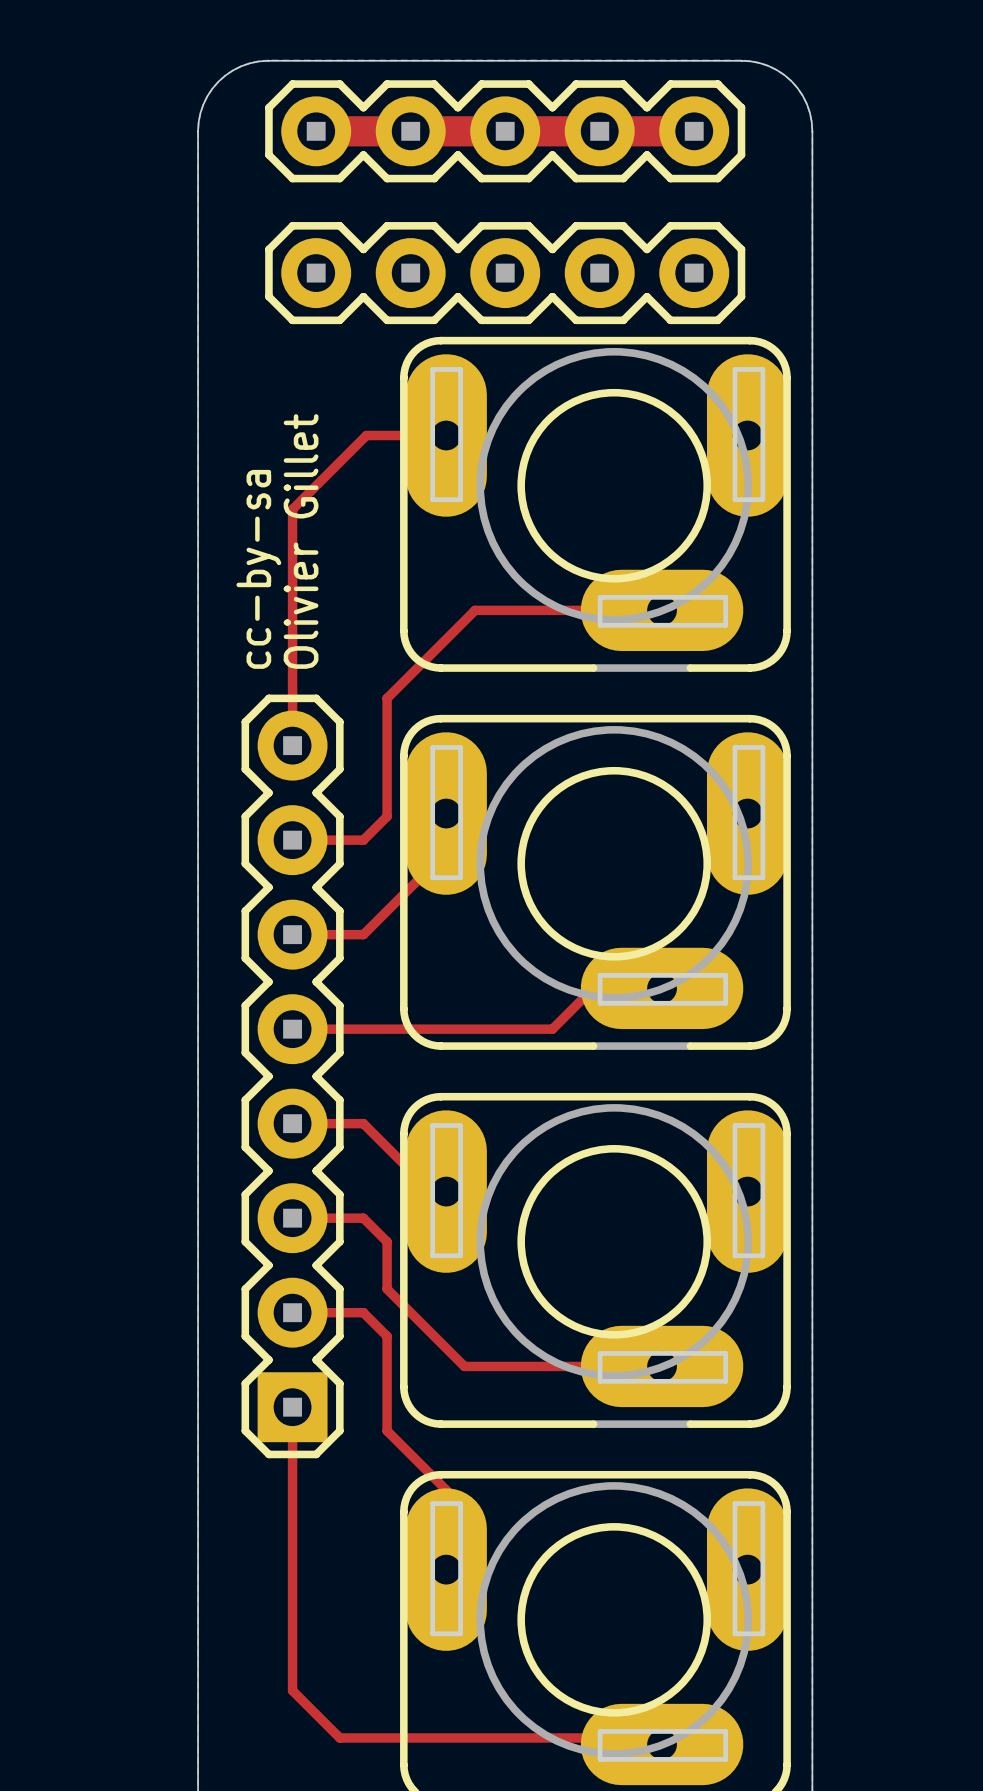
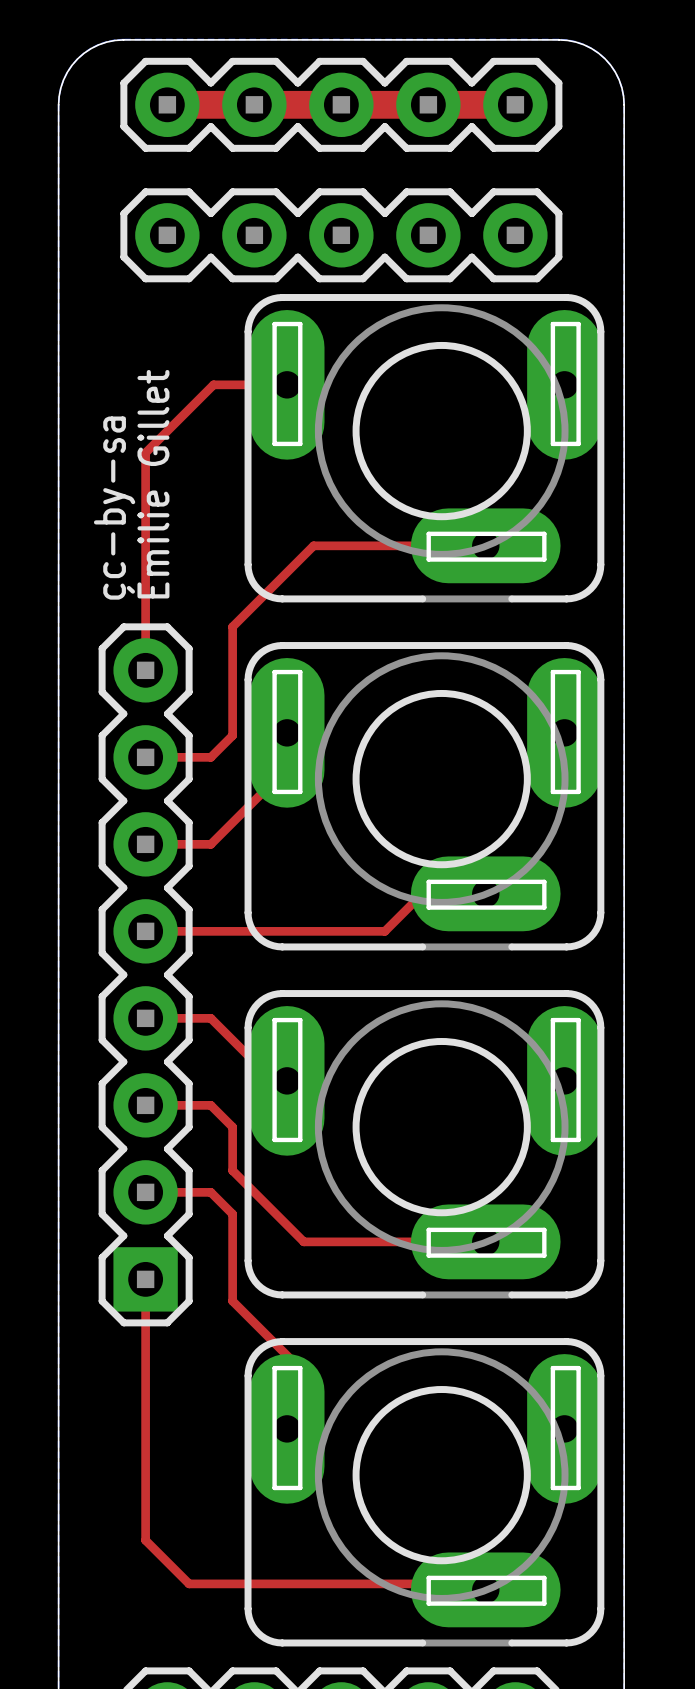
text: Olivier Gillet (301, 541) -> Émilie Gillet (148, 484)

